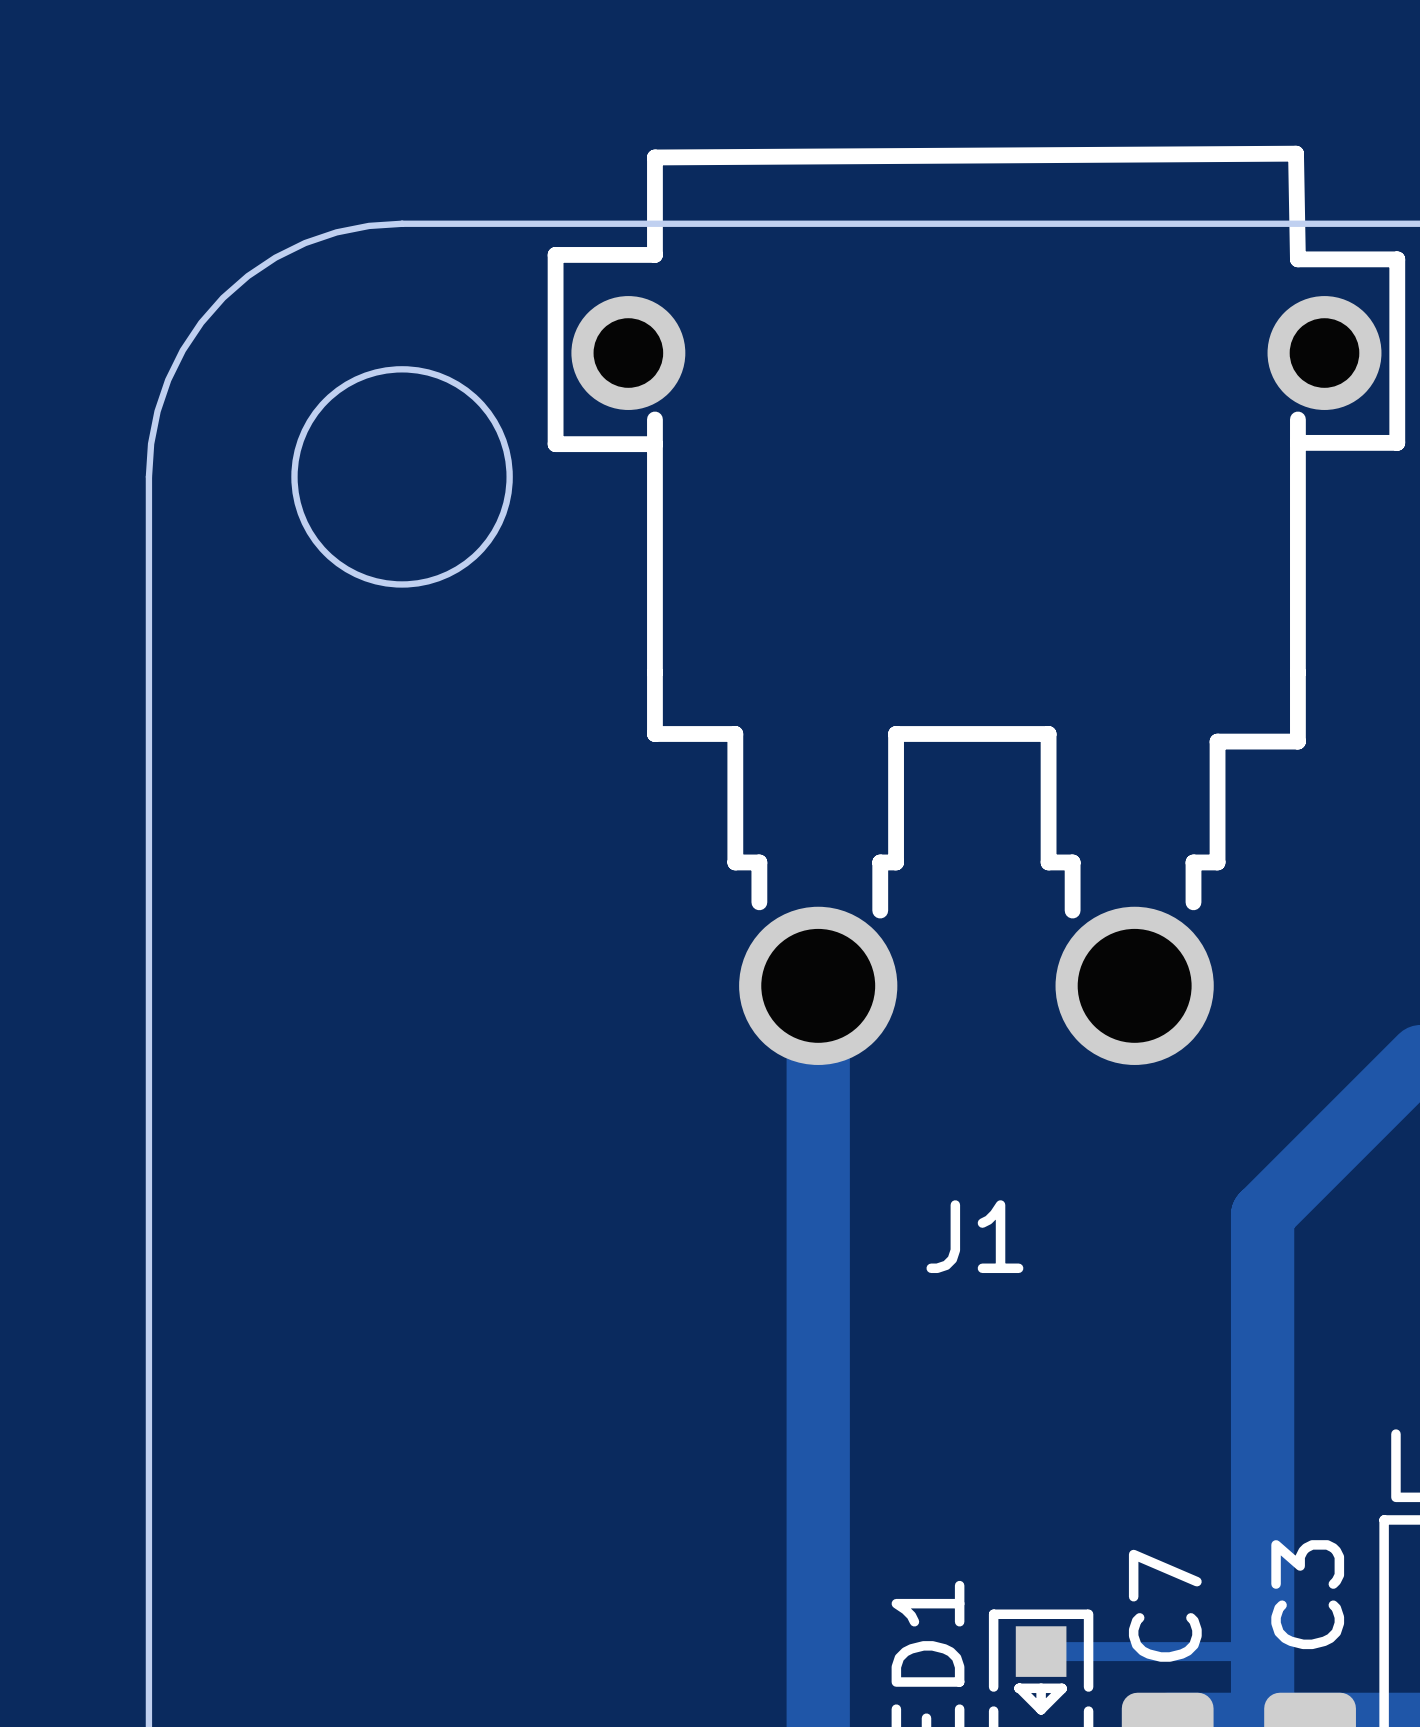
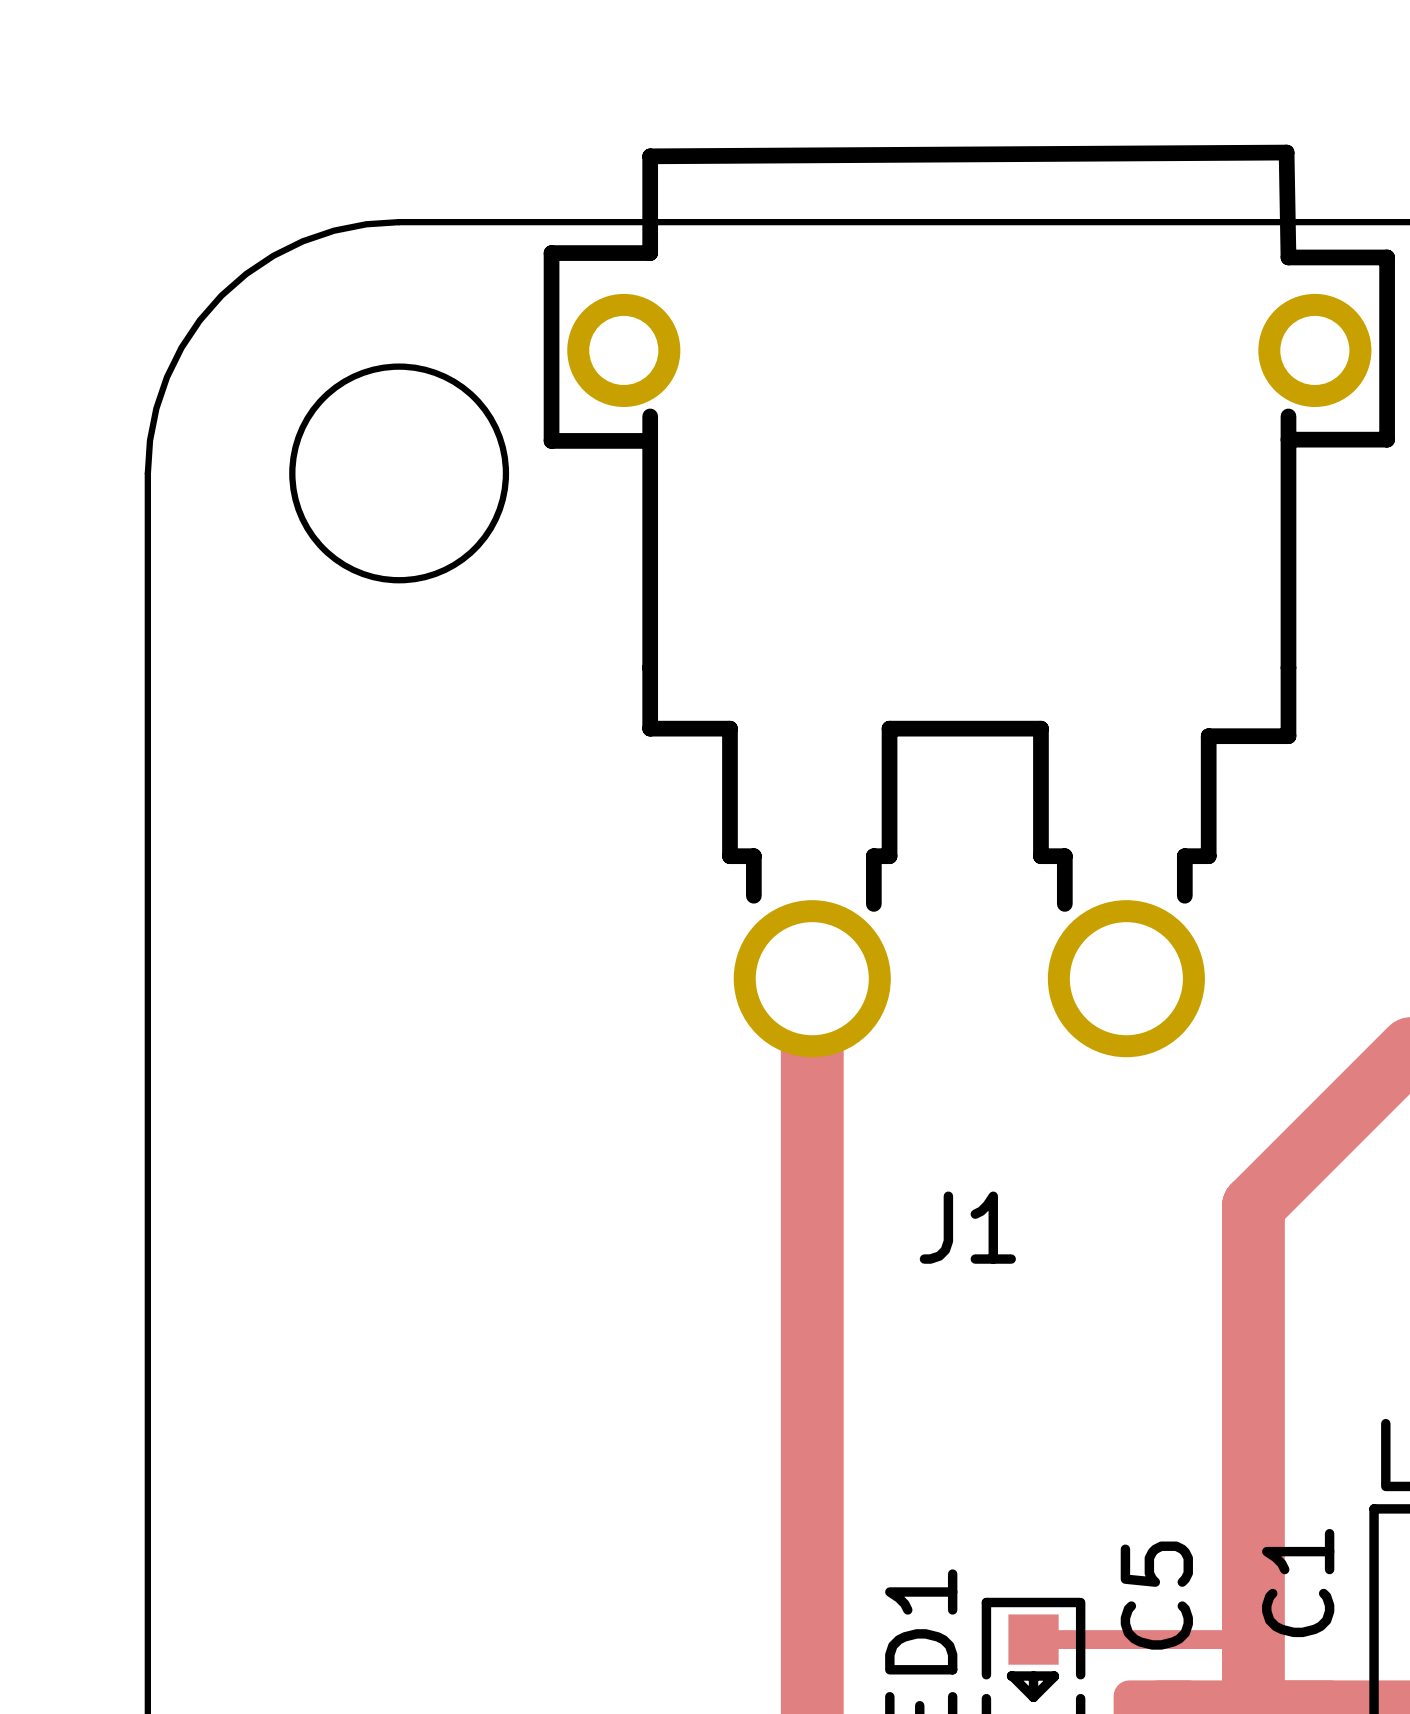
C3 name: C3 (1307, 1594) -> C1 (1298, 1583)
C7 name: C7 (1165, 1605) -> C5 (1156, 1595)

